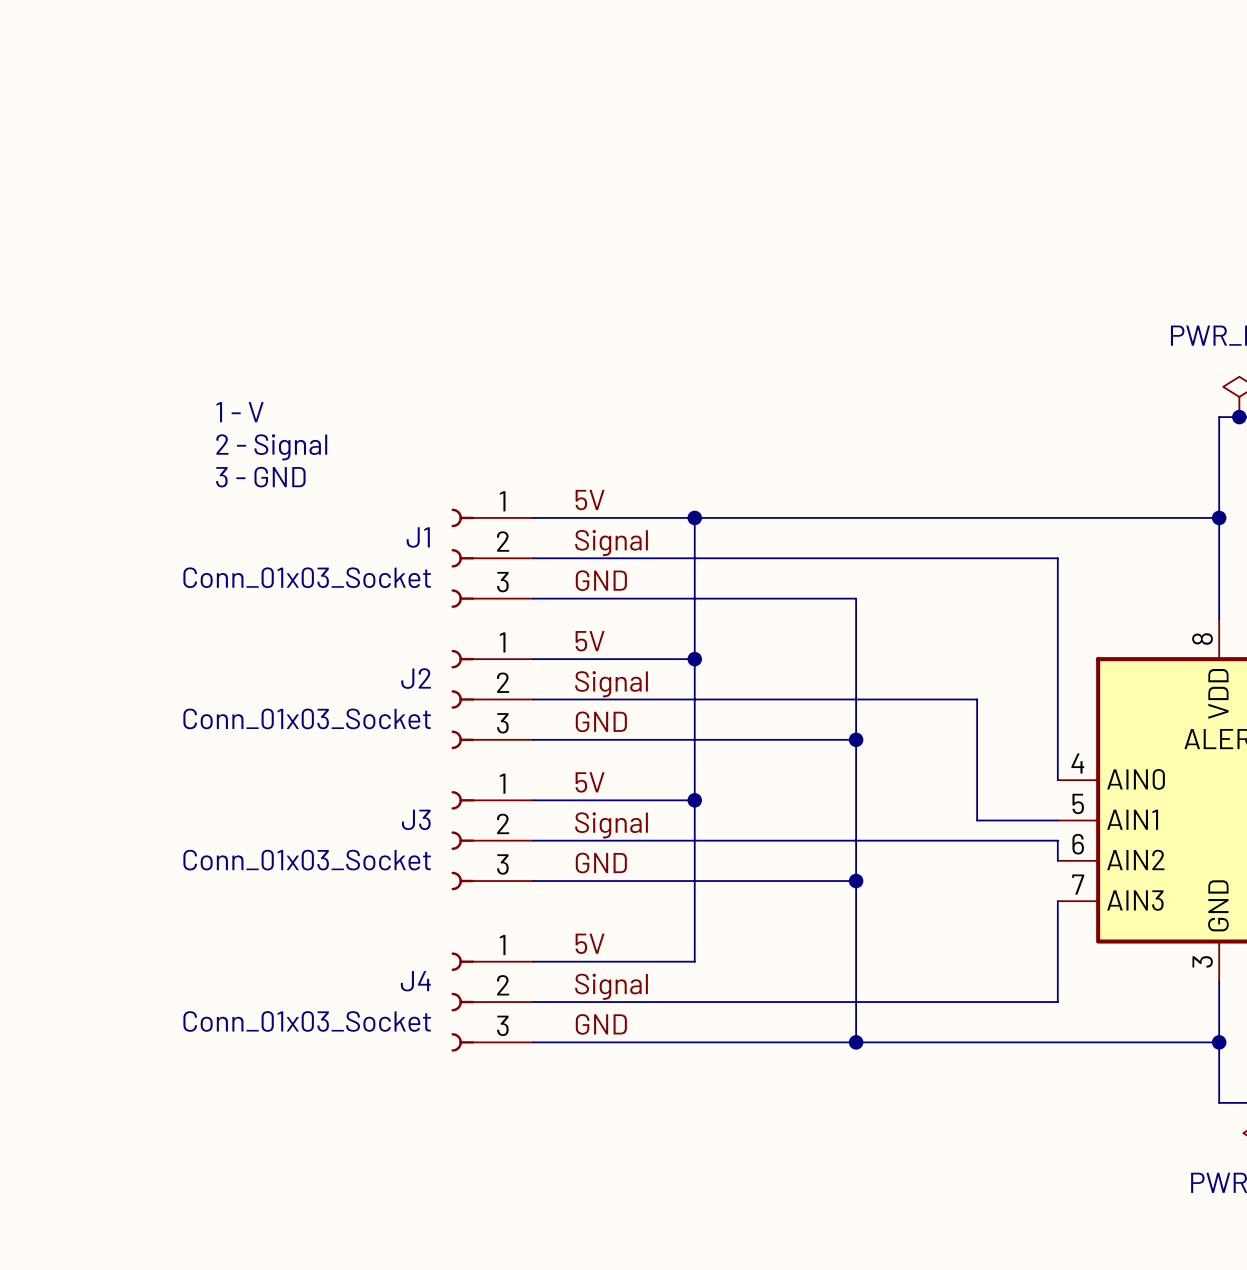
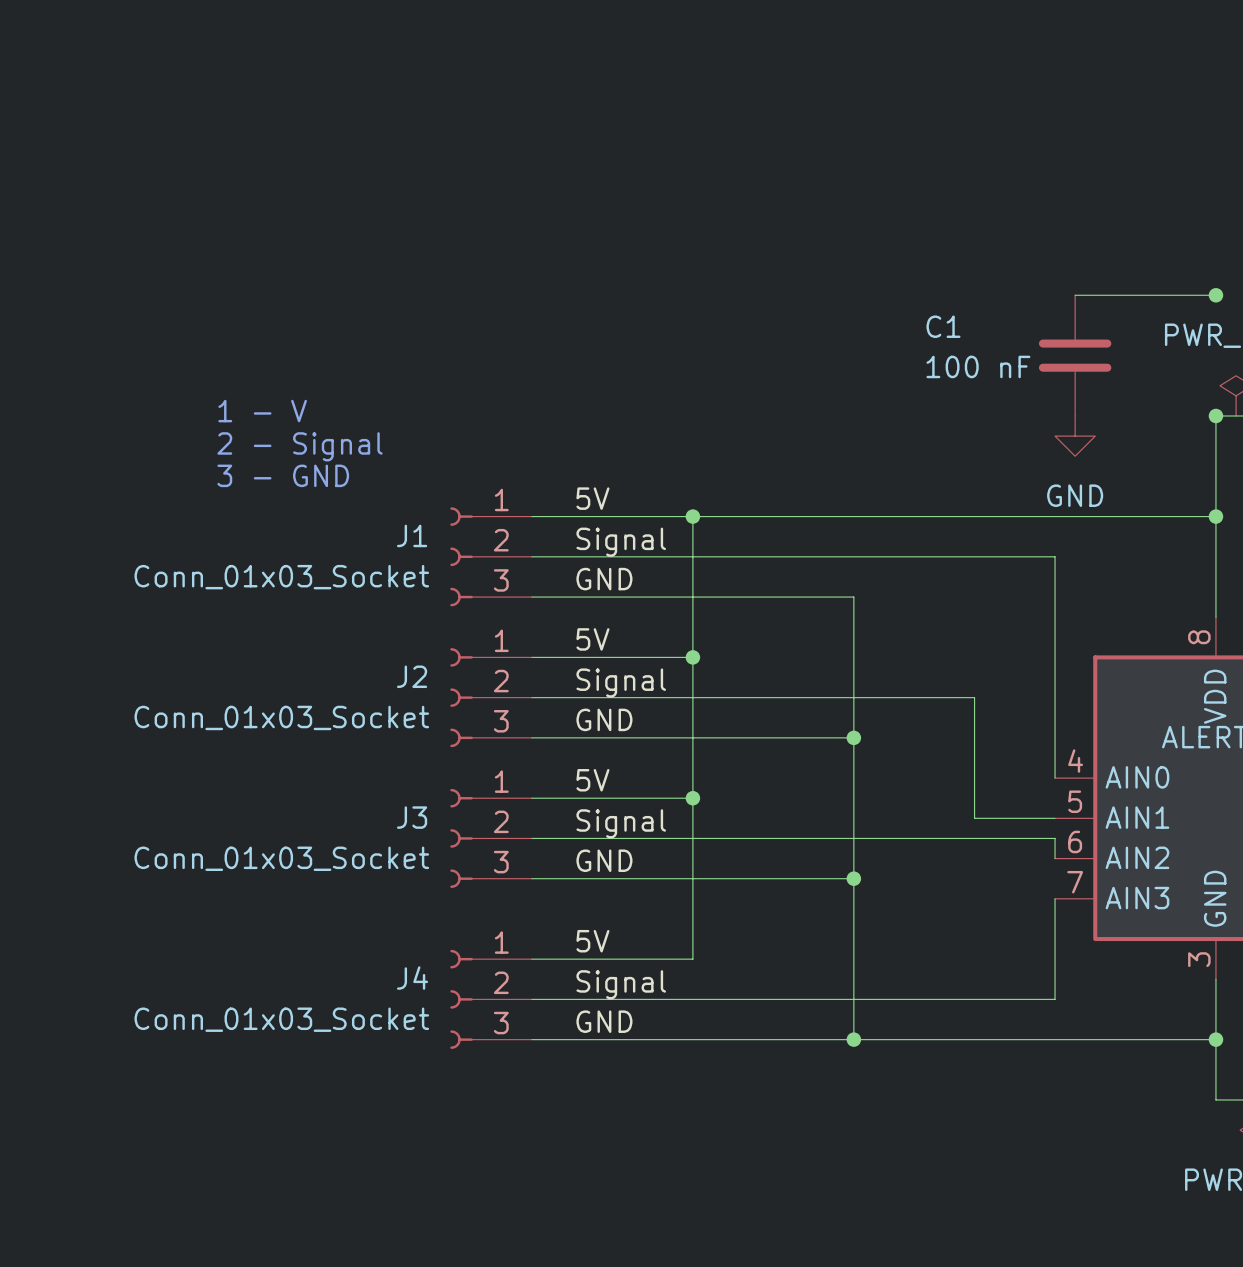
wire: none -> (1075, 295) (1215, 295)
junction: none -> (1215, 295)
C1: none -> 100 nF (1075, 355)
junction position: (1239, 417) -> (1215, 415)
power symbol: none -> GND (1075, 436)

